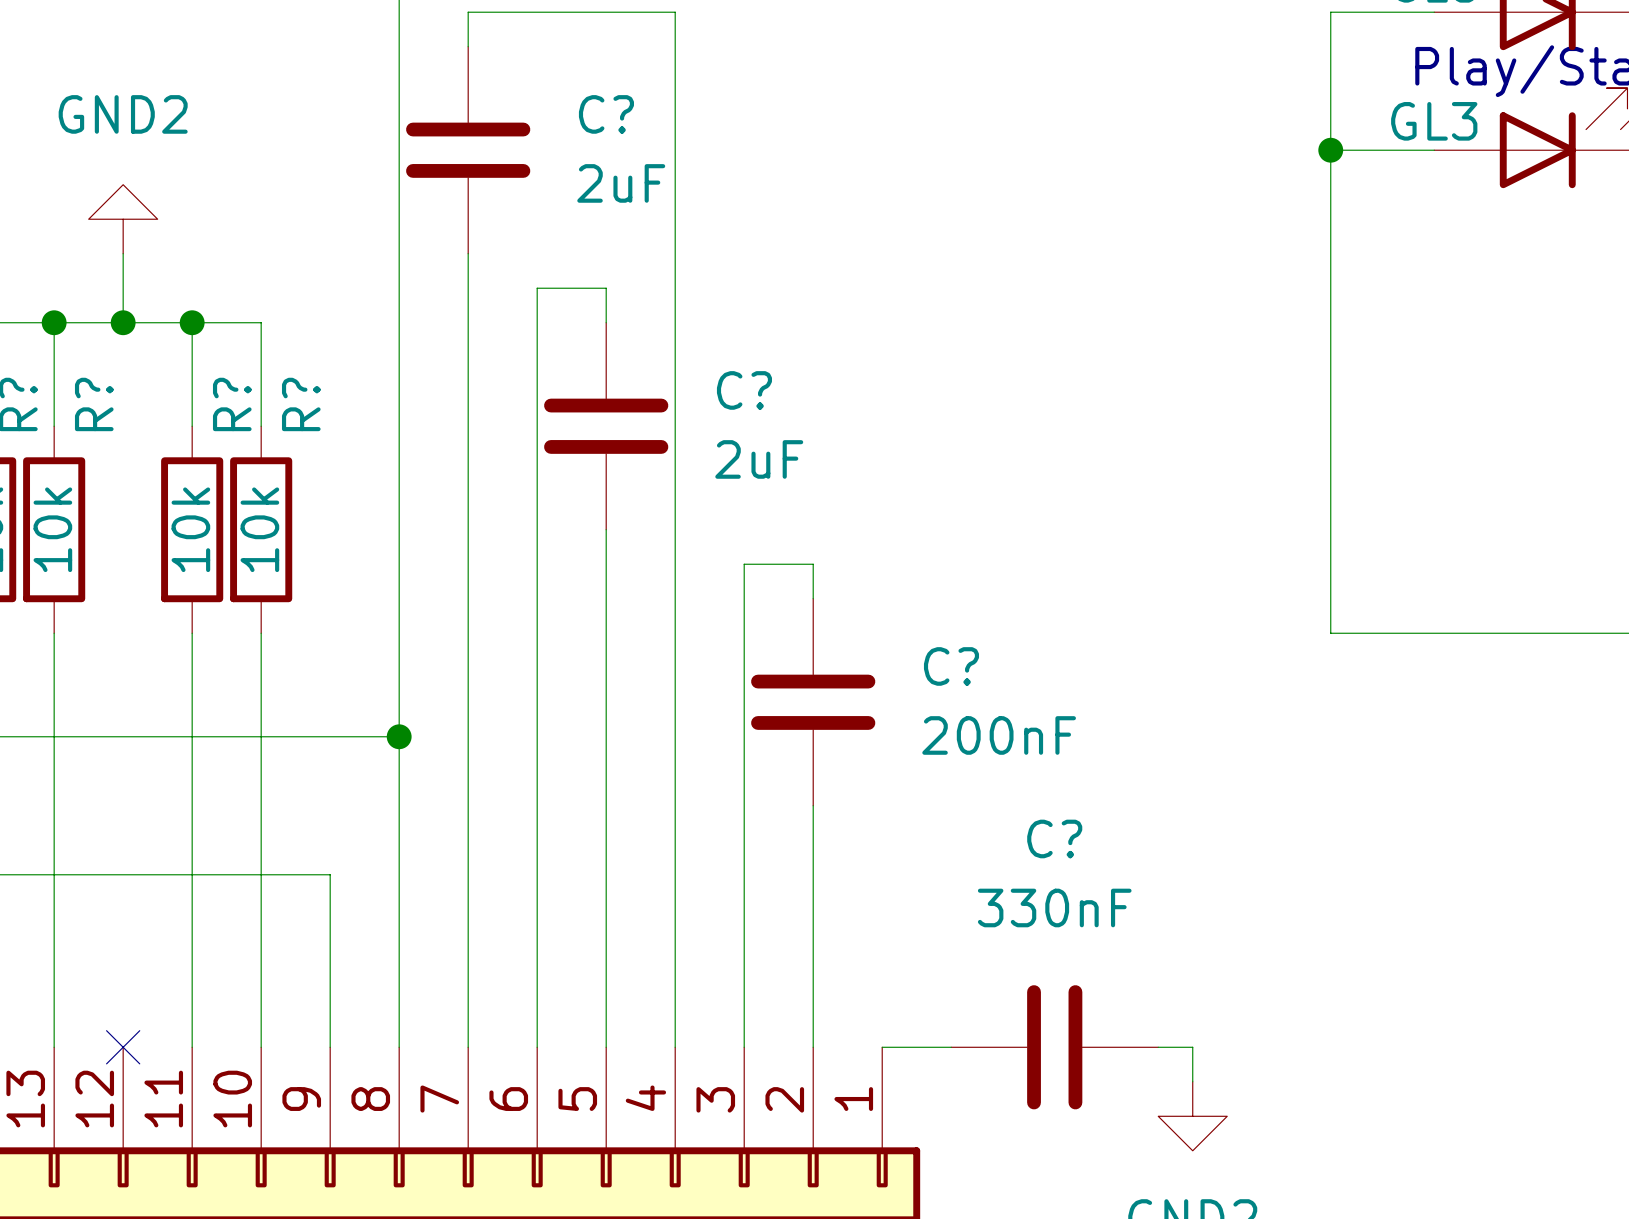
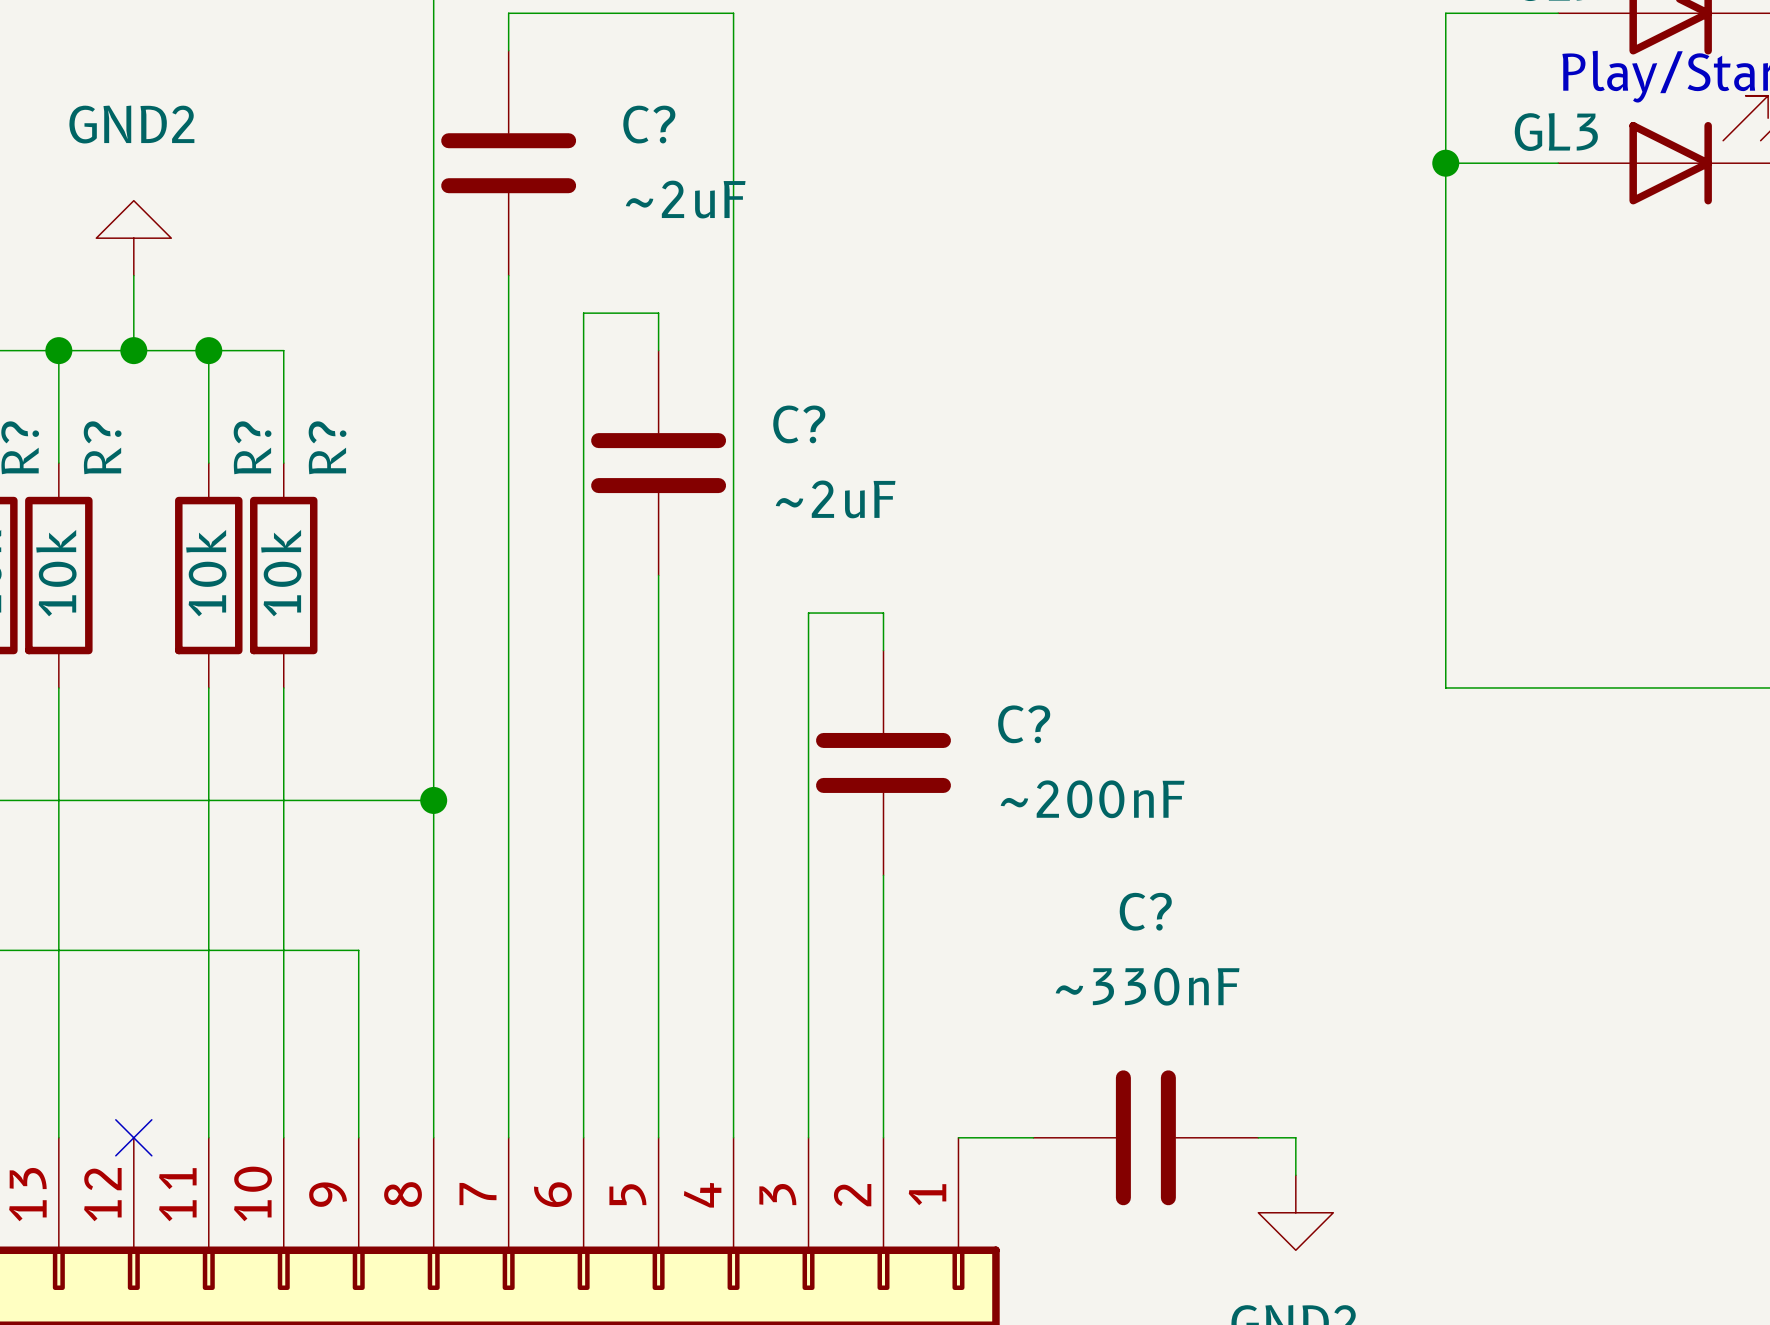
C? value: 2uF (621, 183) -> ~2uF (685, 199)
C? value: 2uF (759, 459) -> ~2uF (835, 499)
C? value: 200nF (999, 735) -> ~200nF (1092, 799)
C? value: 330nF (1054, 907) -> ~330nF (1147, 986)

